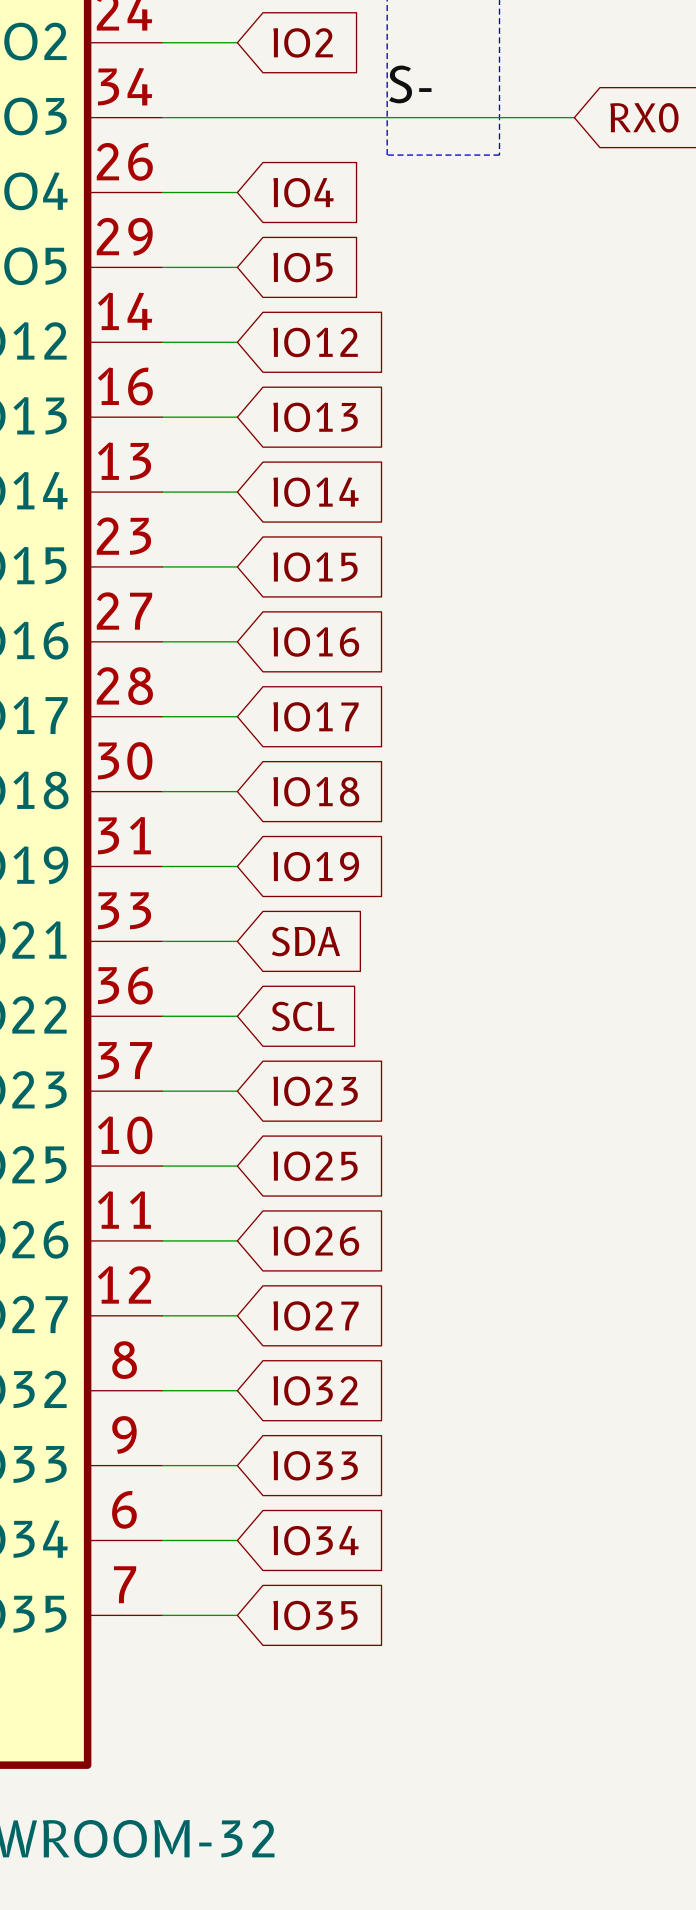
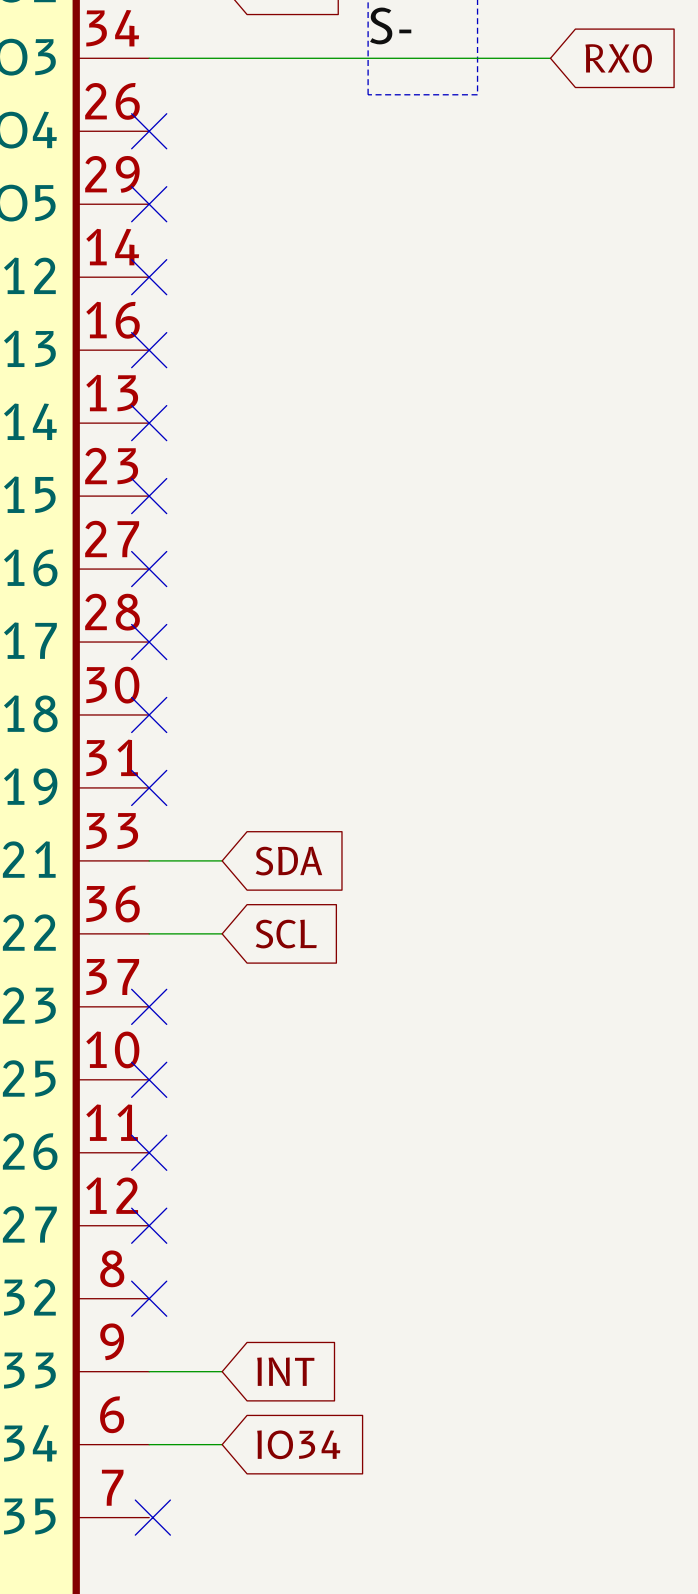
wire: (162, 192) (237, 192) -> none
no-connect mark: none -> (149, 131)
global label: IO4 (303, 192) -> none
wire: (162, 267) (237, 267) -> none
no-connect mark: none -> (149, 204)
global label: IO5 (303, 267) -> none
wire: (162, 342) (237, 342) -> none
no-connect mark: none -> (149, 277)
global label: IO12 (315, 342) -> none
wire: (162, 417) (237, 417) -> none
no-connect mark: none -> (149, 350)
global label: IO13 (315, 417) -> none
wire: (162, 492) (237, 492) -> none
no-connect mark: none -> (149, 423)
global label: IO14 (315, 492) -> none
wire: (162, 566) (237, 566) -> none
no-connect mark: none -> (149, 496)
global label: IO15 (315, 567) -> none
wire: (162, 641) (237, 641) -> none
no-connect mark: none -> (149, 569)
global label: IO16 (316, 642) -> none
wire: (162, 716) (237, 716) -> none
no-connect mark: none -> (149, 642)
global label: IO17 (315, 716) -> none
wire: (162, 791) (237, 791) -> none
no-connect mark: none -> (149, 714)
global label: IO18 (316, 791) -> none
wire: (162, 866) (237, 866) -> none
no-connect mark: none -> (149, 787)
global label: IO19 (316, 866) -> none
wire: (162, 1091) (237, 1091) -> none
no-connect mark: none -> (149, 1006)
global label: IO23 (315, 1091) -> none
wire: (162, 1166) (237, 1166) -> none
no-connect mark: none -> (149, 1079)
global label: IO25 (315, 1166) -> none
wire: (162, 1240) (237, 1240) -> none
no-connect mark: none -> (149, 1152)
global label: IO26 (316, 1241) -> none
wire: (162, 1315) (237, 1315) -> none
no-connect mark: none -> (149, 1225)
global label: IO27 (315, 1315) -> none
wire: (162, 1390) (237, 1390) -> none
no-connect mark: none -> (149, 1298)
global label: IO32 (315, 1390) -> none
global label: IO33 (315, 1465) -> INT (285, 1371)
wire: (162, 1615) (237, 1615) -> none
no-connect mark: none -> (152, 1517)
global label: IO35 (315, 1615) -> none

